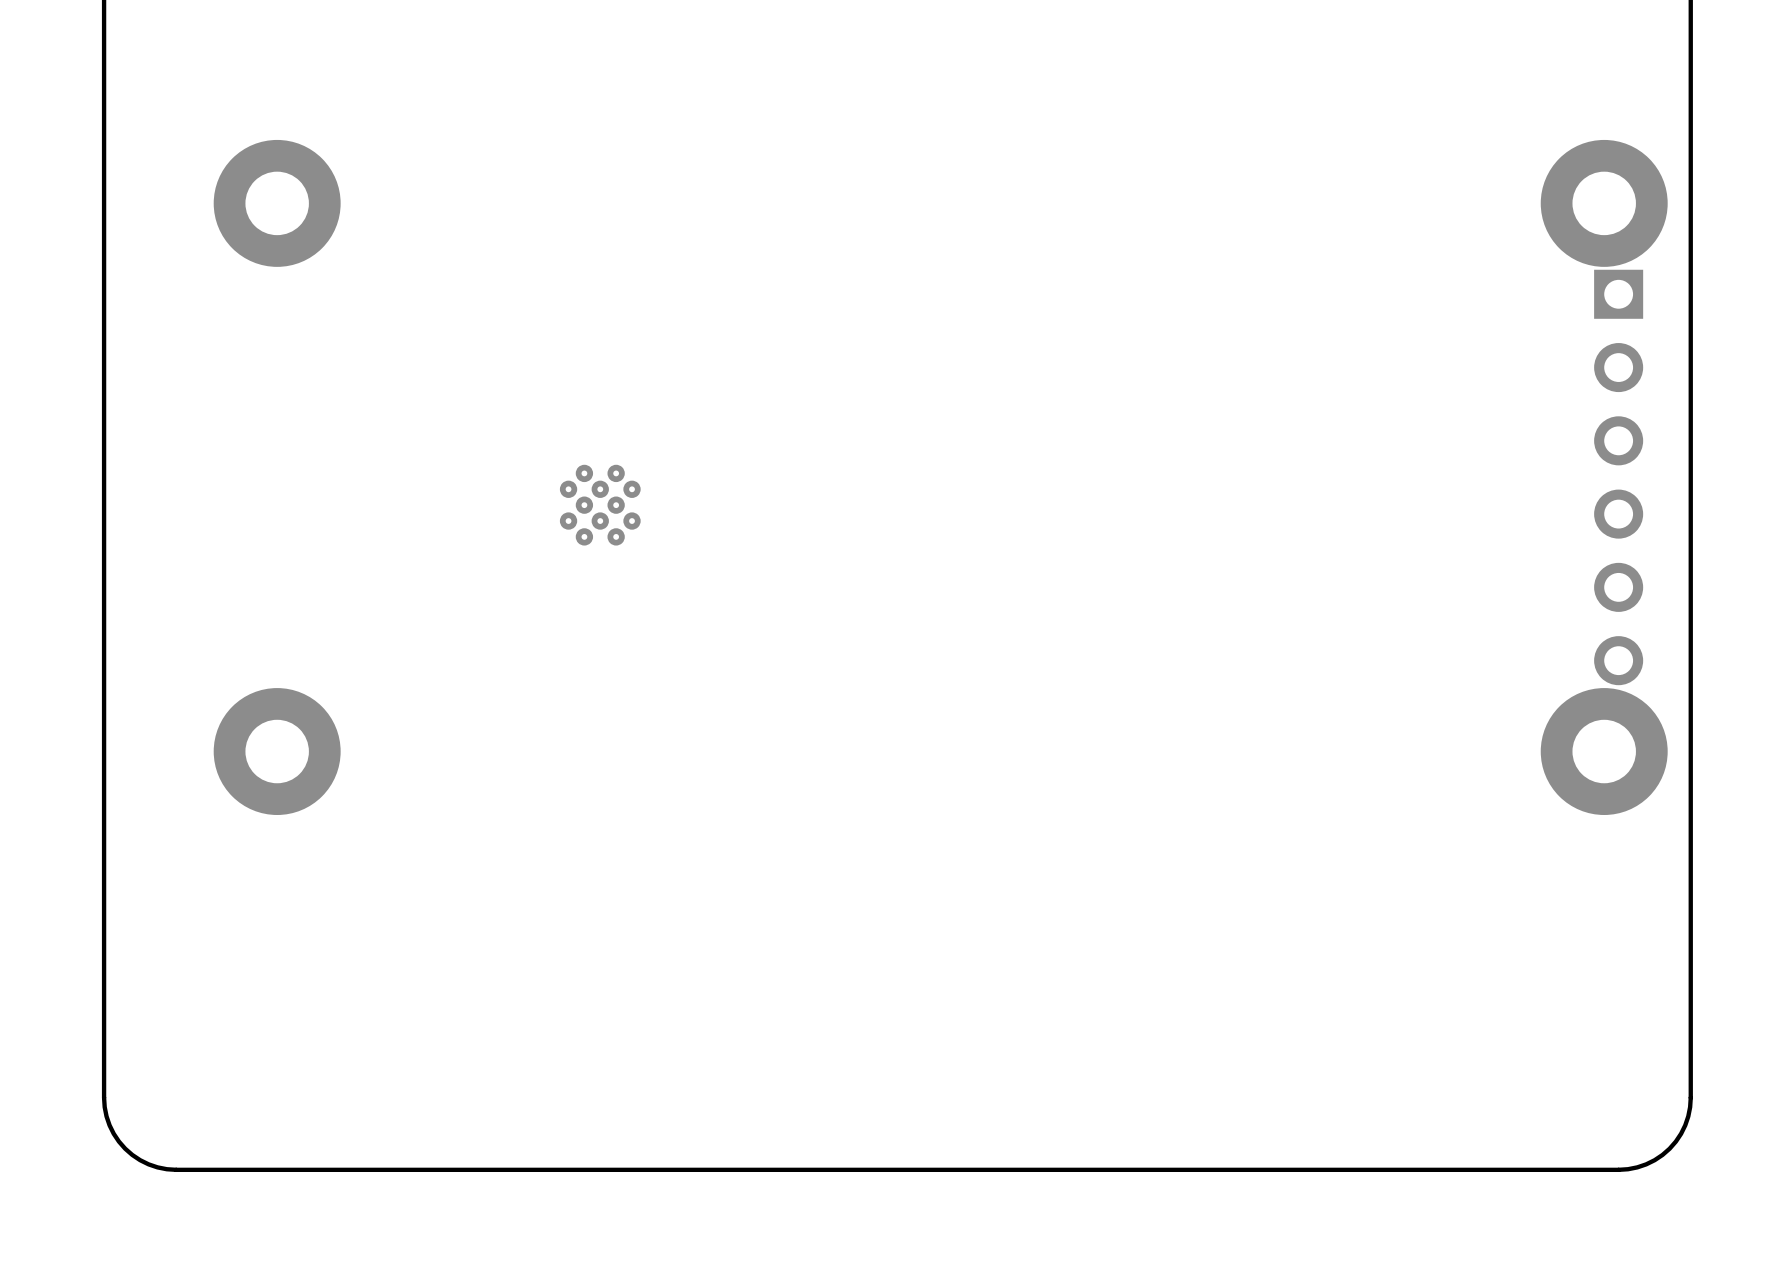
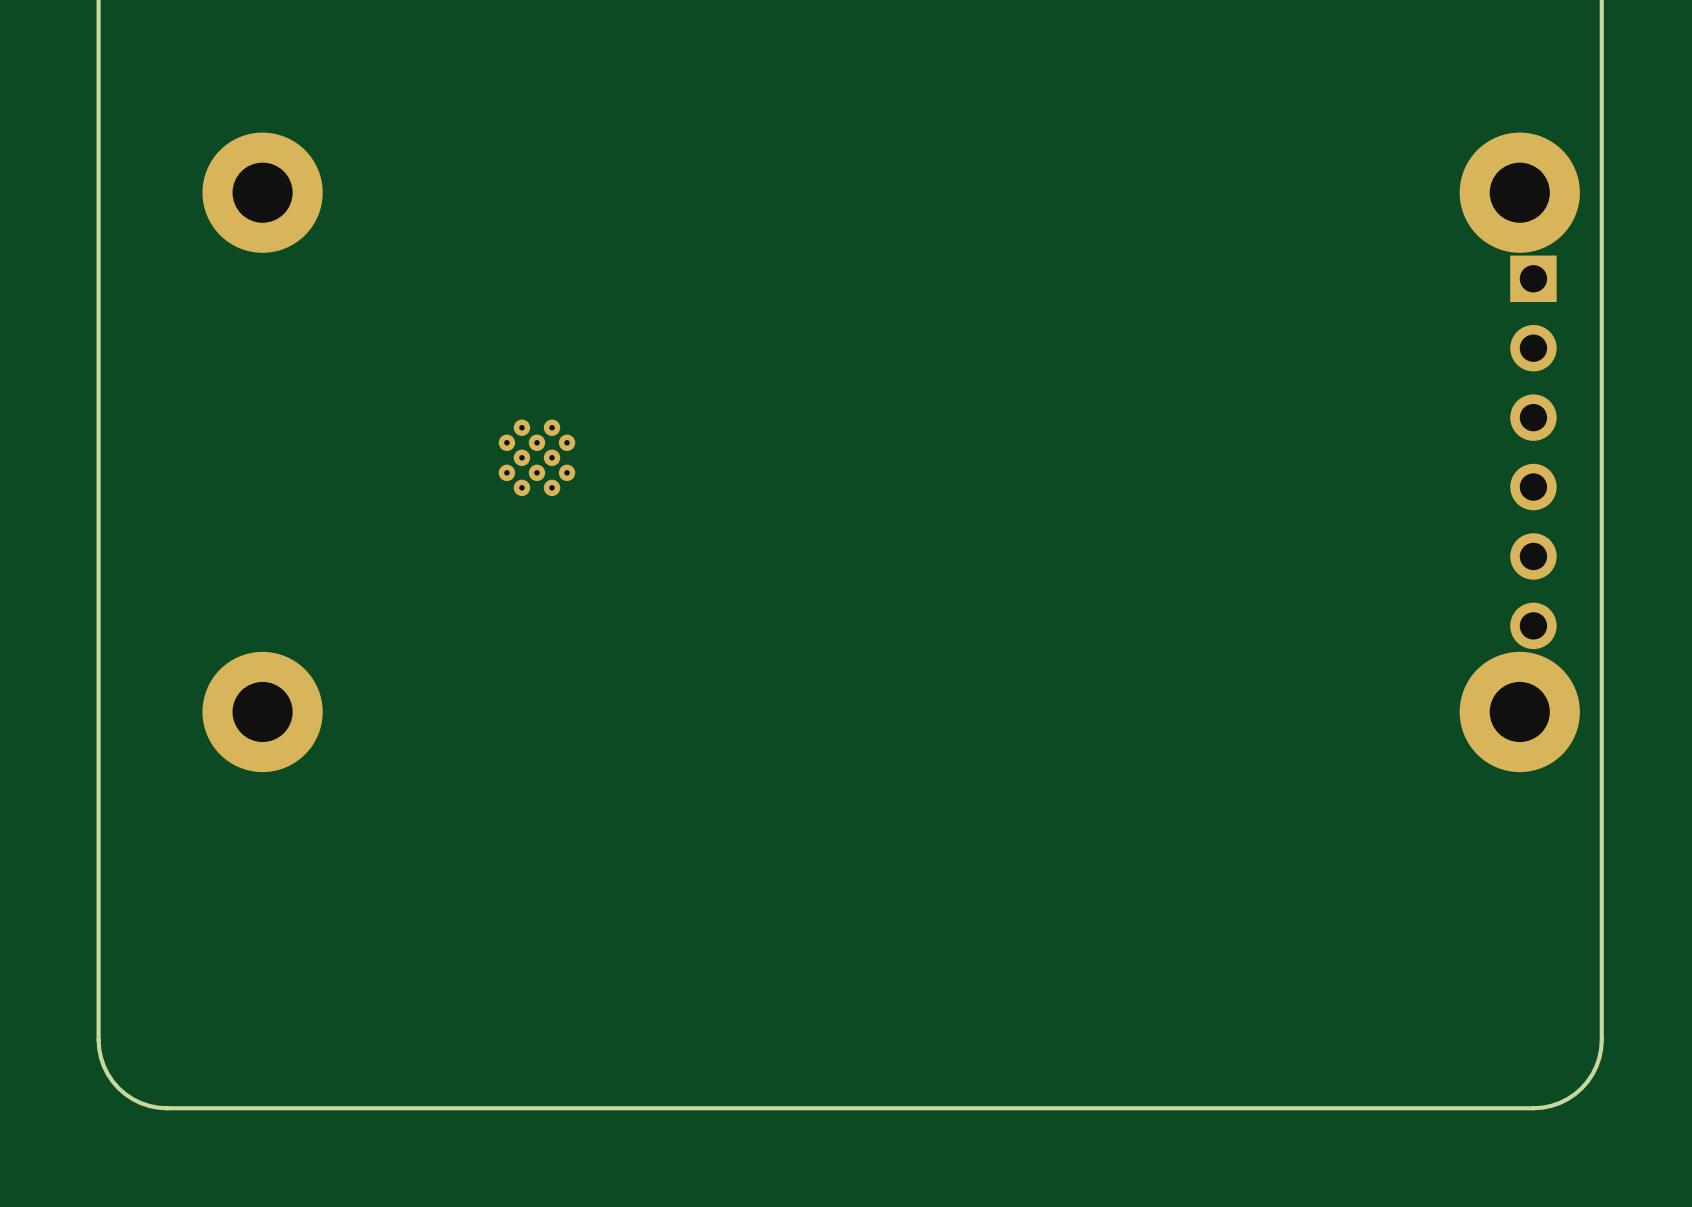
part position: (600, 505) -> (536, 457)

